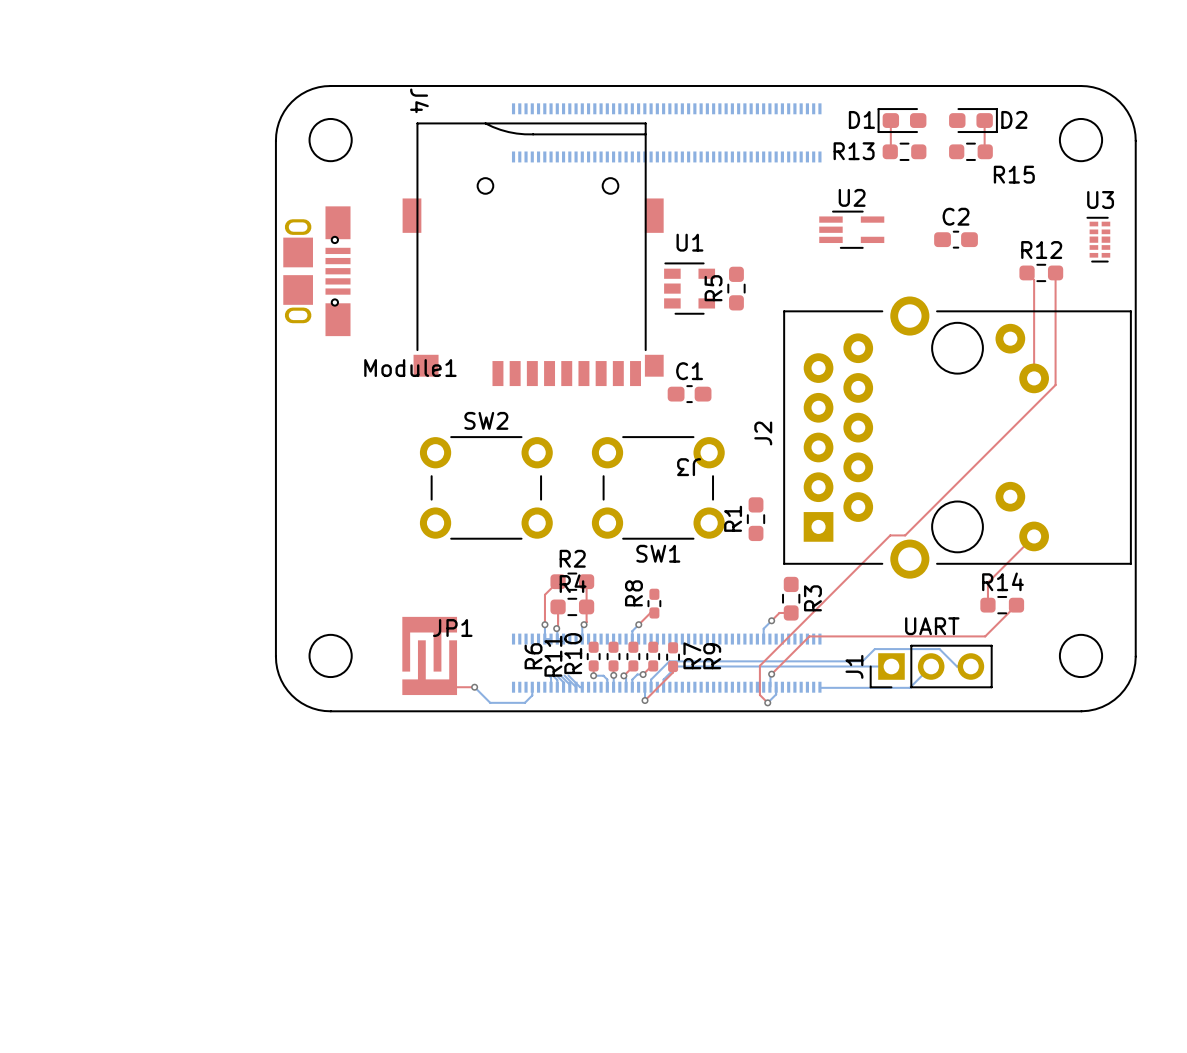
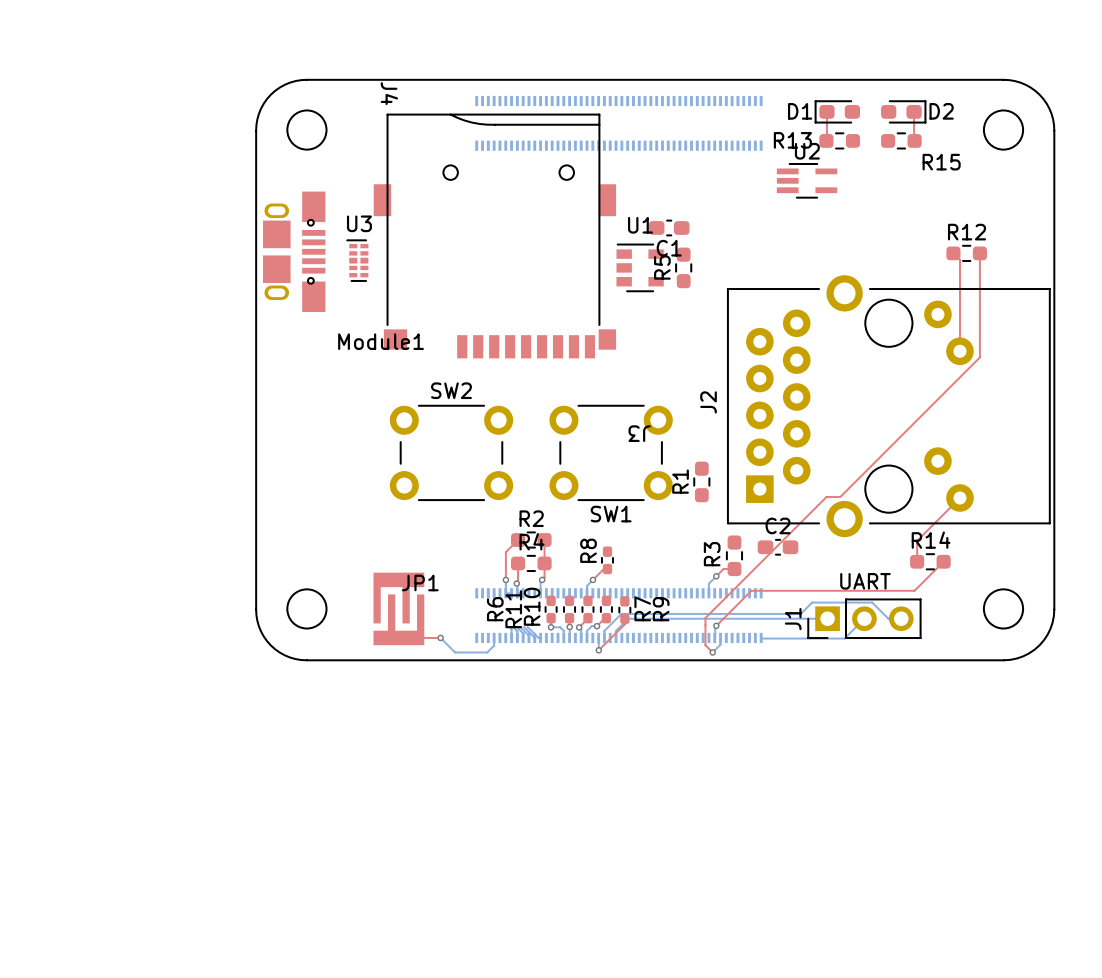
U2 position: (851, 229) -> (807, 180)
C2 position: (956, 239) -> (778, 547)
U3 position: (1098, 239) -> (357, 260)
C1 name position: C1 (689, 371) -> C1 (669, 248)
C1 position: (689, 394) -> (669, 227)
R3 name position: R3 (812, 598) -> R3 (712, 554)

